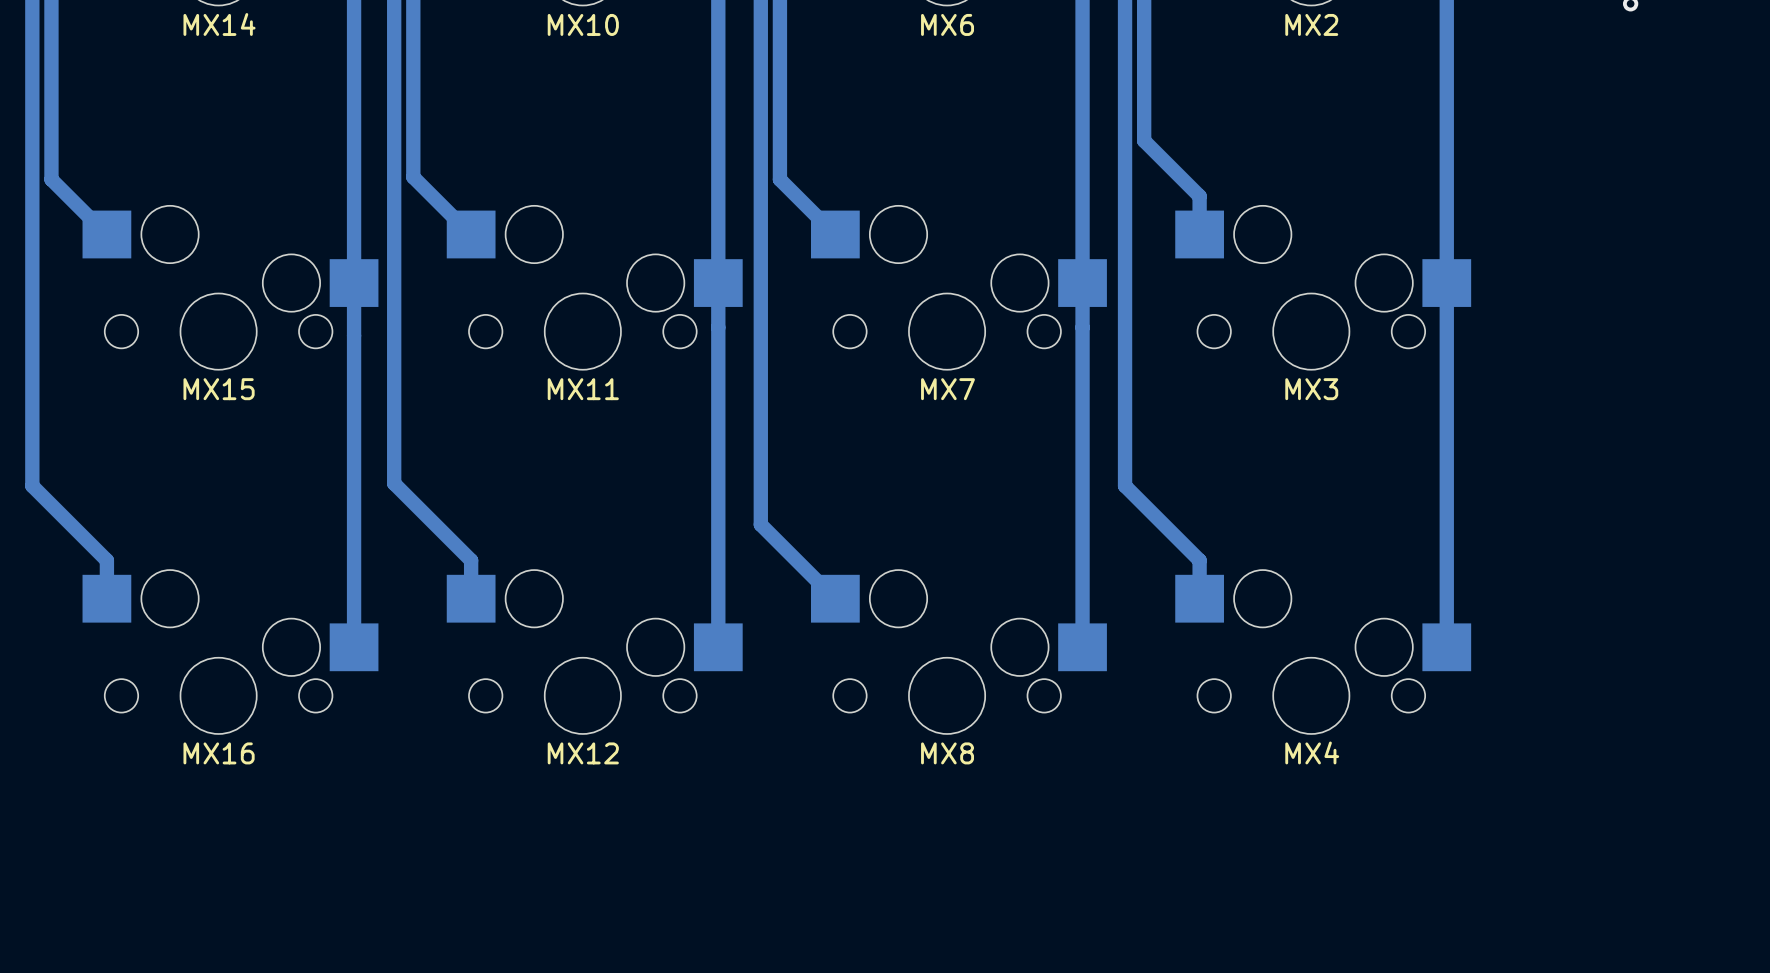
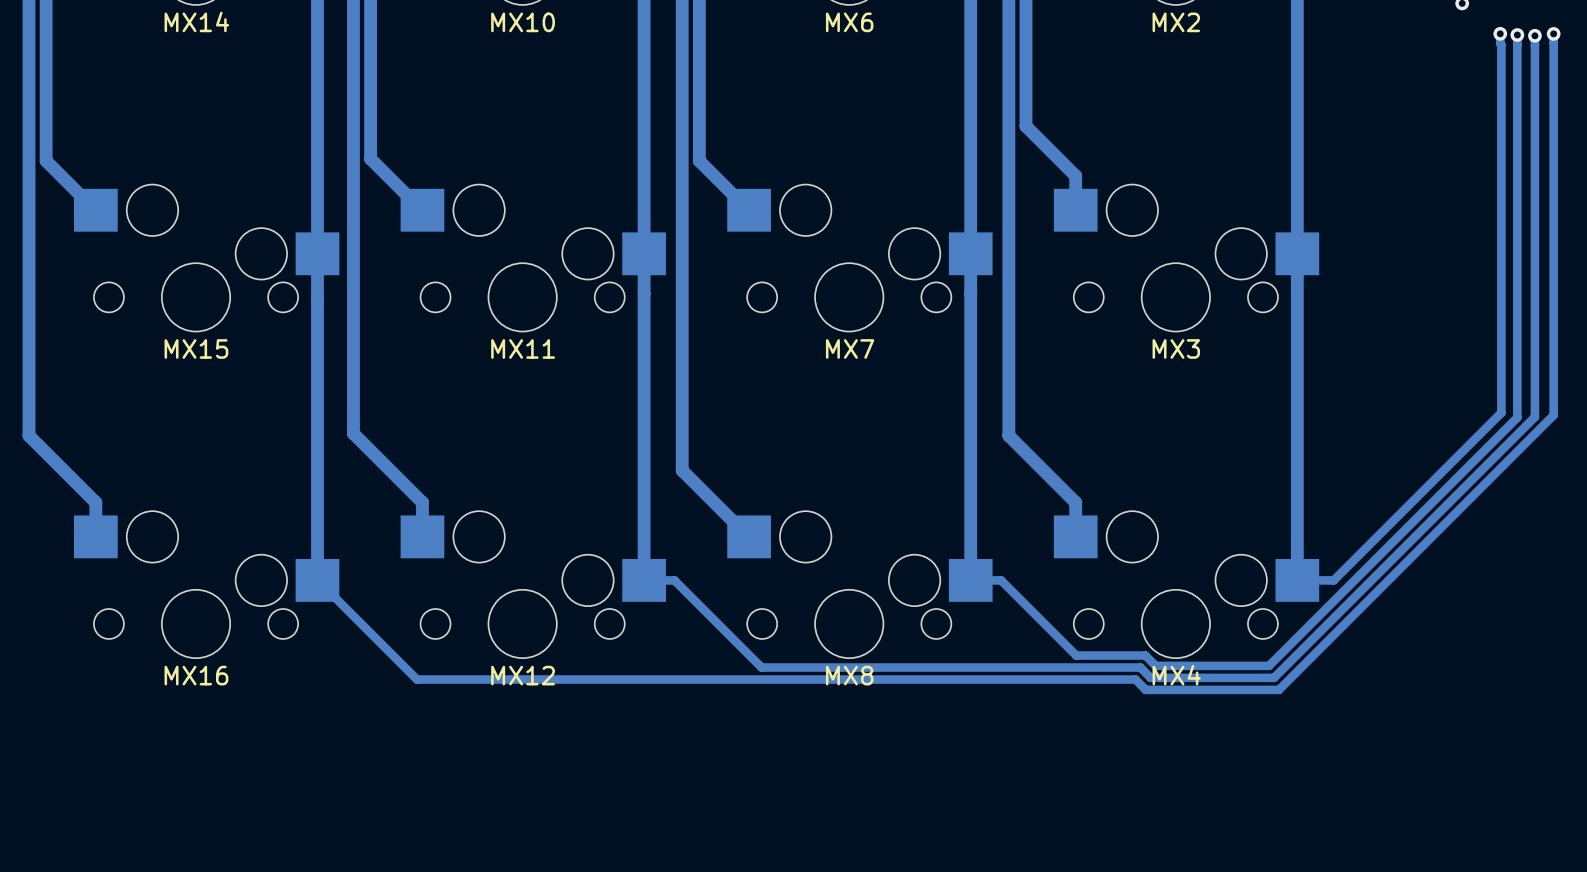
track: none -> (1500, 33) (1501, 412) (1333, 580) (1297, 580) (1297, 550)
via: none -> (1500, 33)
track: none -> (1553, 33) (1553, 415) (1279, 689) (1145, 689) (1135, 679) (417, 679) (317, 580)
via: none -> (1553, 33)
track: none -> (1517, 35) (1517, 417) (1269, 665) (1155, 665) (1145, 655) (1076, 655) (1001, 580) (970, 580)
via: none -> (1517, 35)
track: none -> (1534, 35) (1534, 416) (1274, 677) (1150, 677) (1140, 667) (761, 667) (674, 580) (644, 580)
via: none -> (1534, 35)

